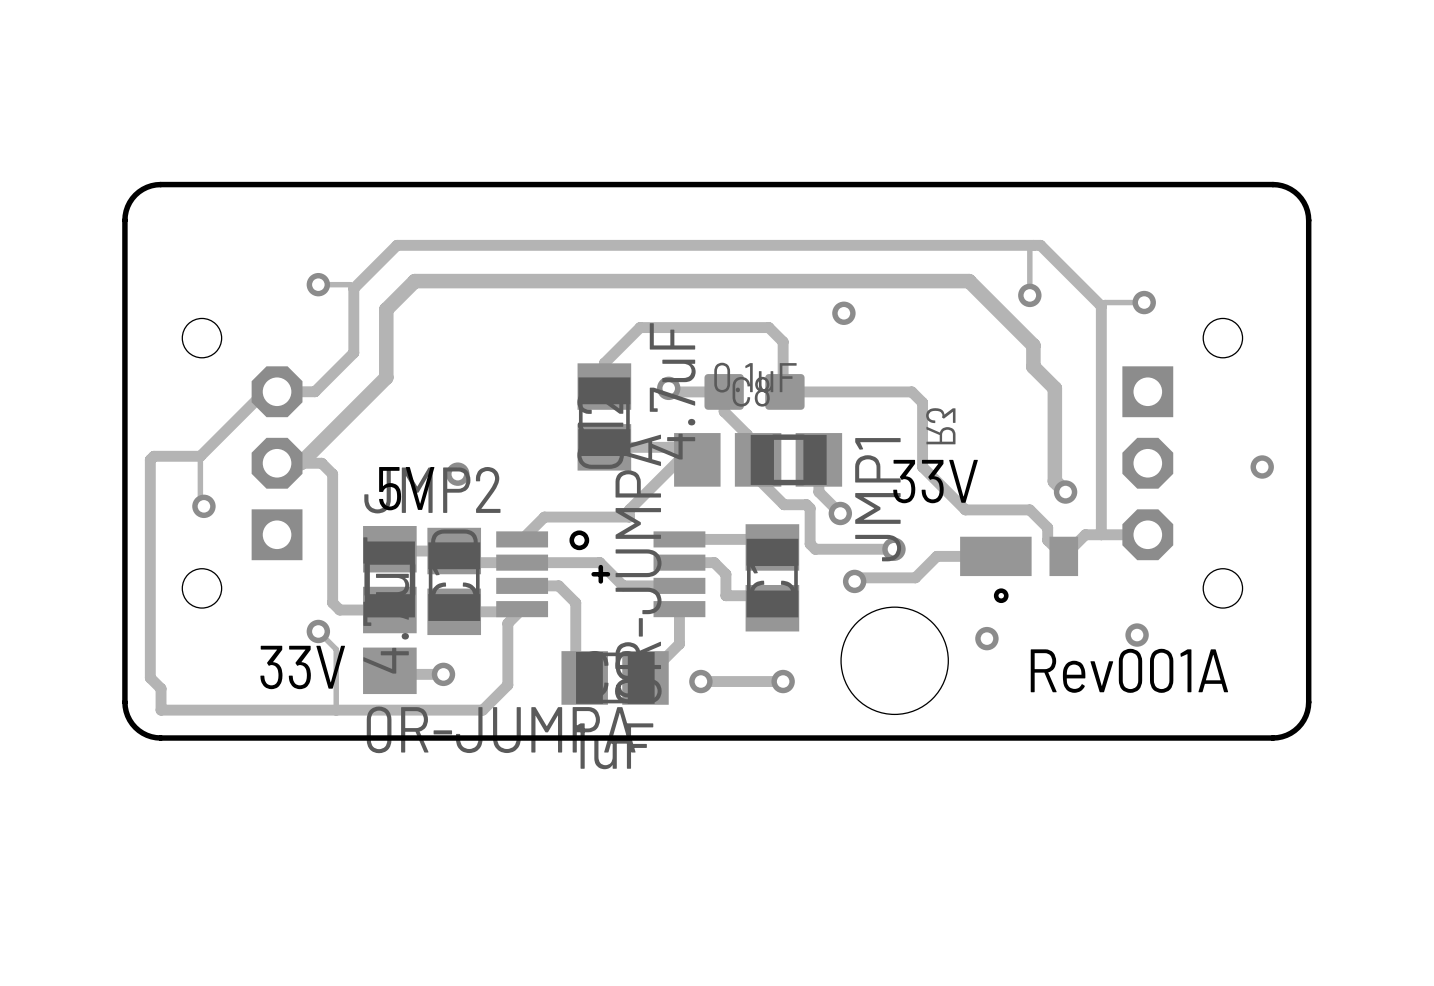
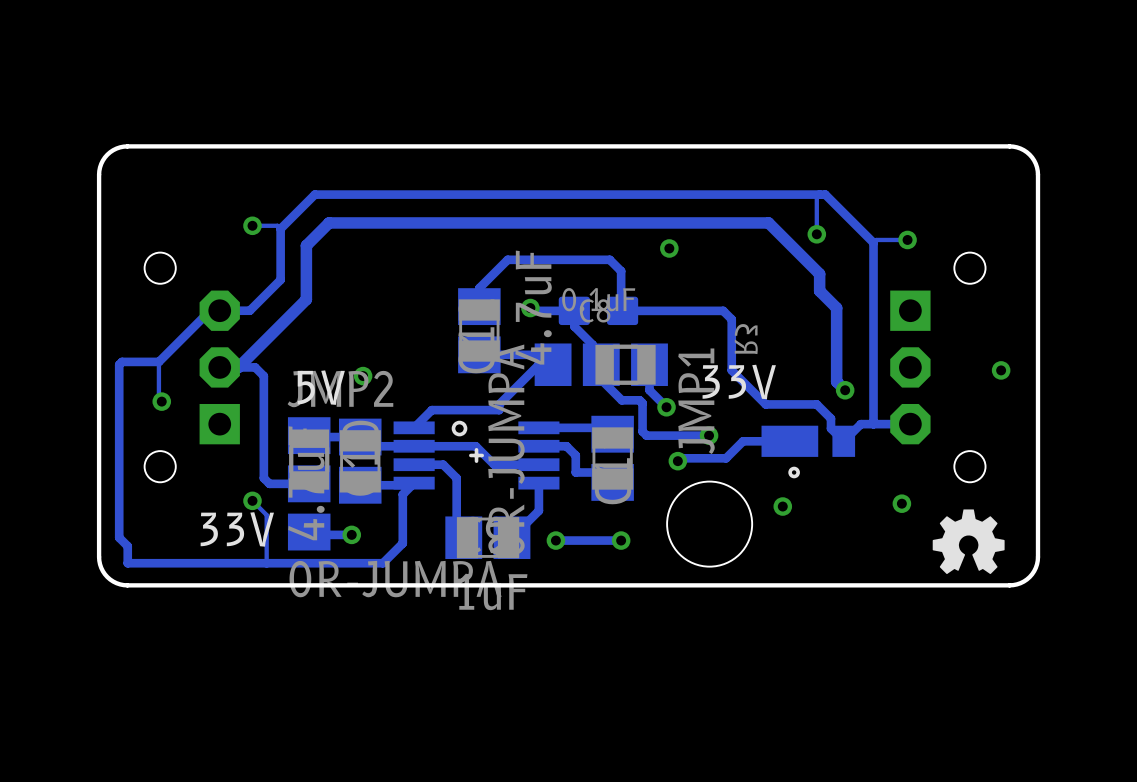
drawing: none -> [932, 509, 1005, 574]
text: Rev001A (1129, 670) -> none

